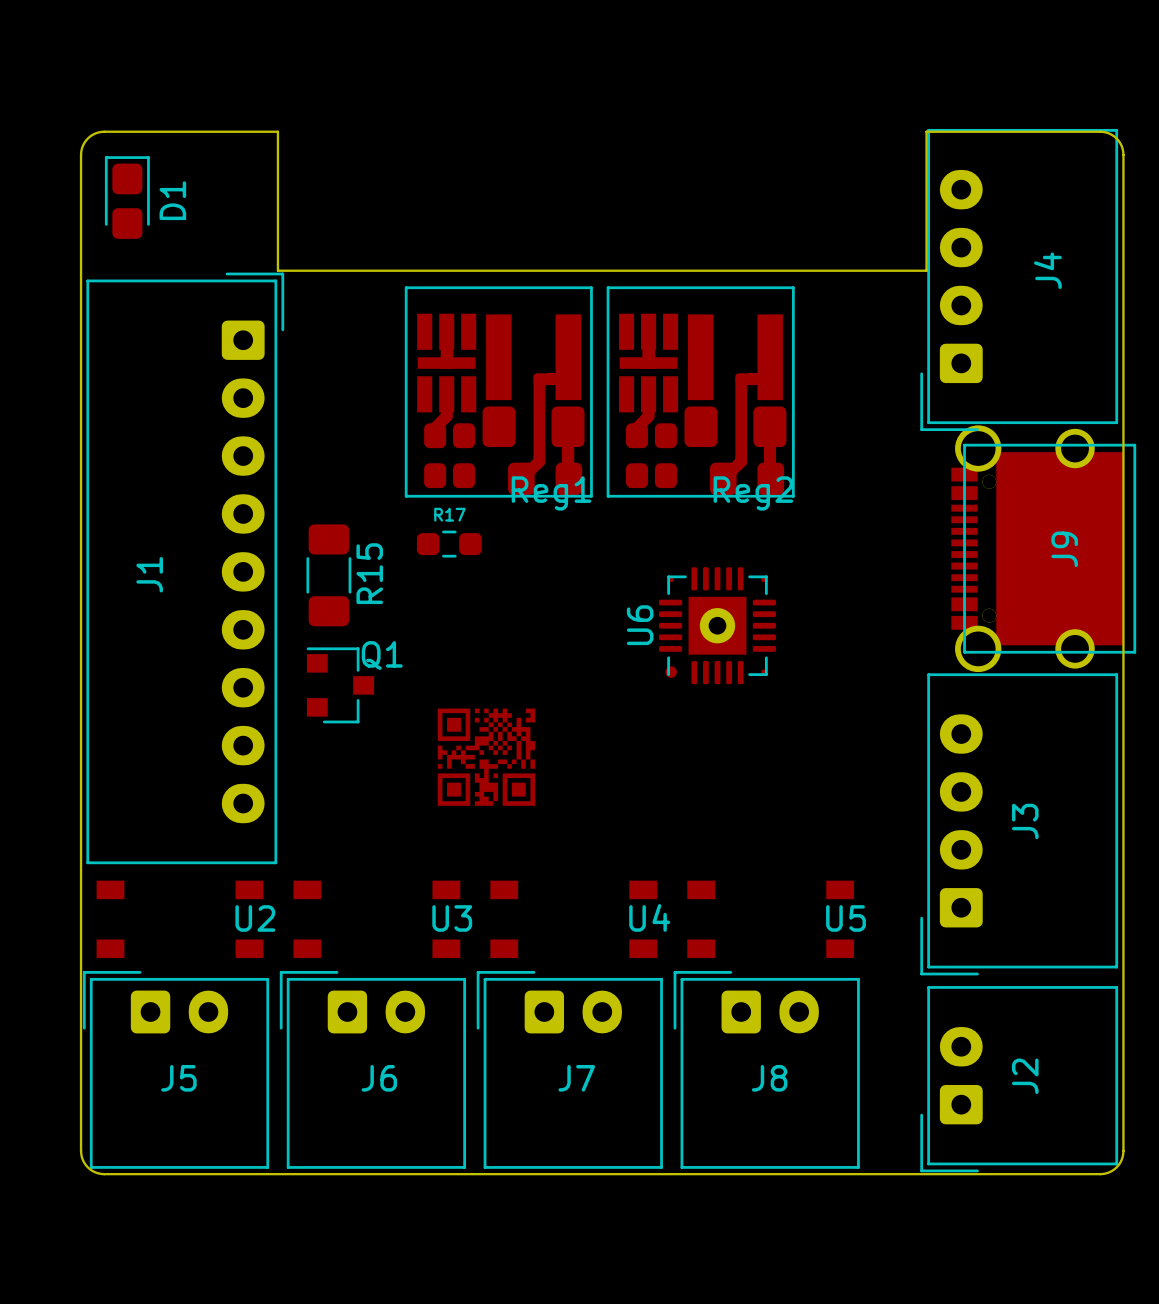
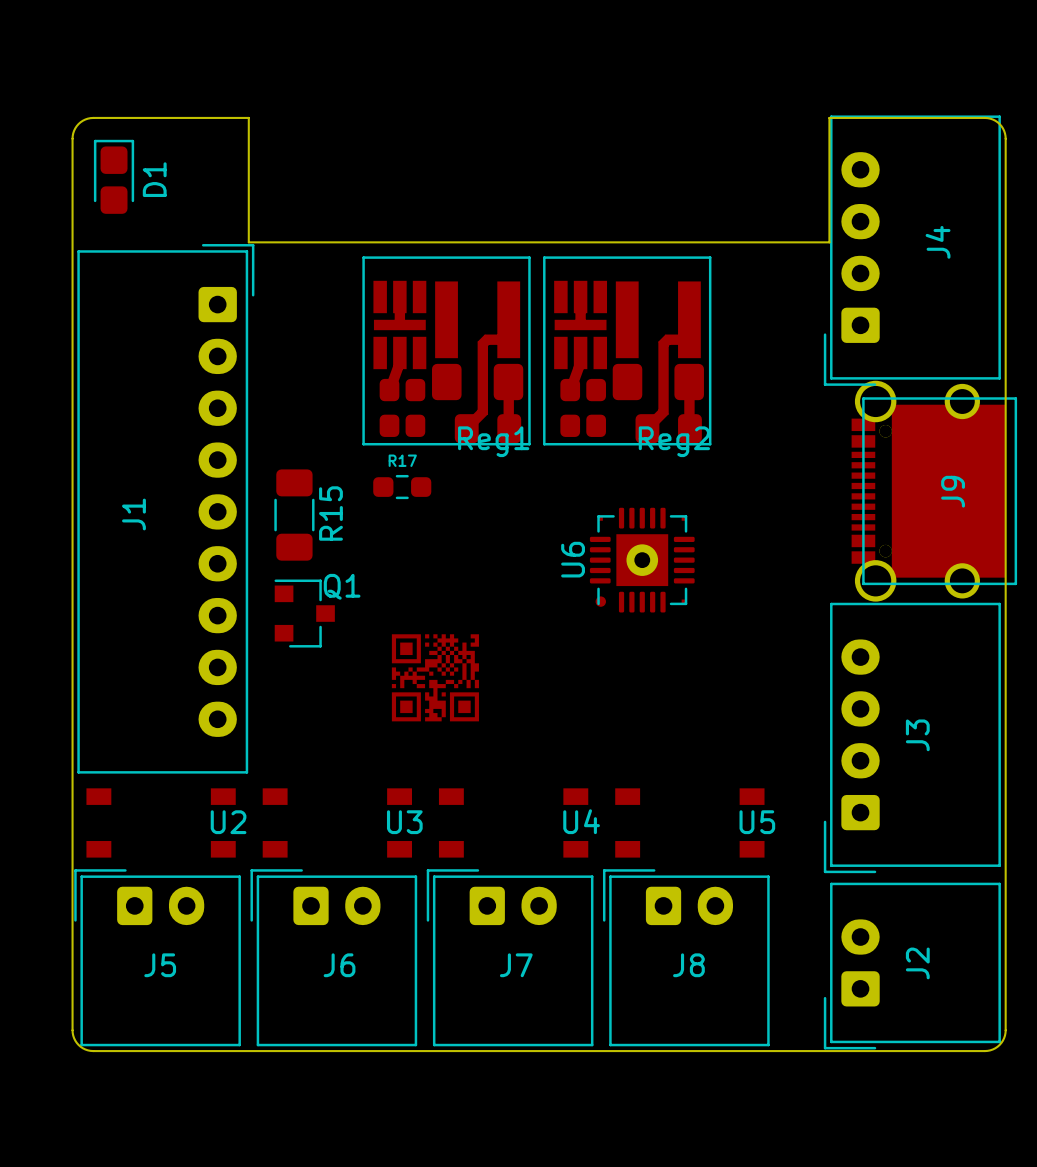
Reg1 footprint: [404, 286, 593, 498] -> [362, 256, 531, 446]
Reg2 footprint: [606, 286, 795, 498] -> [543, 256, 712, 446]

